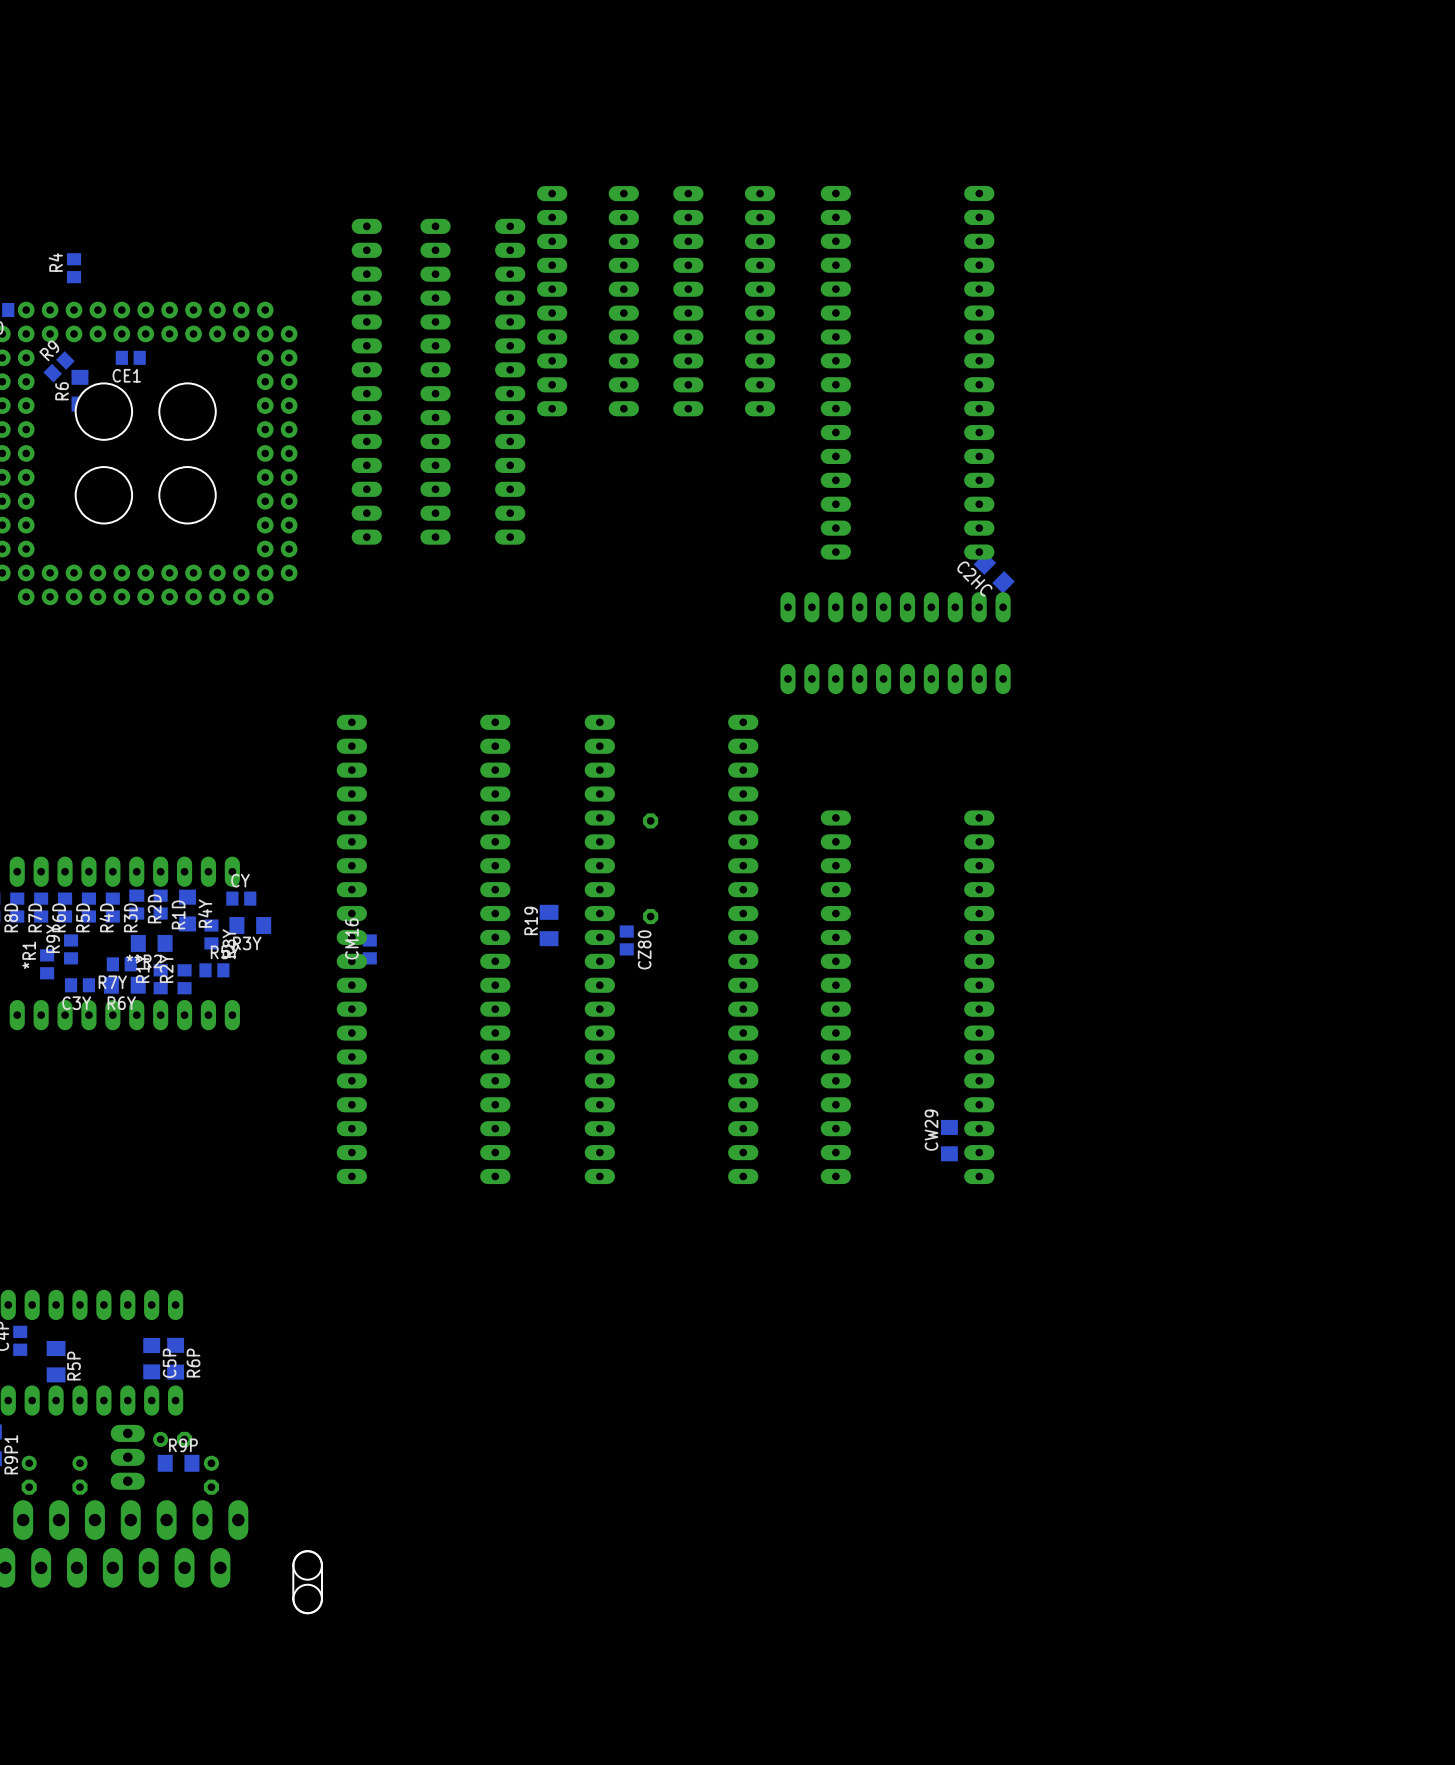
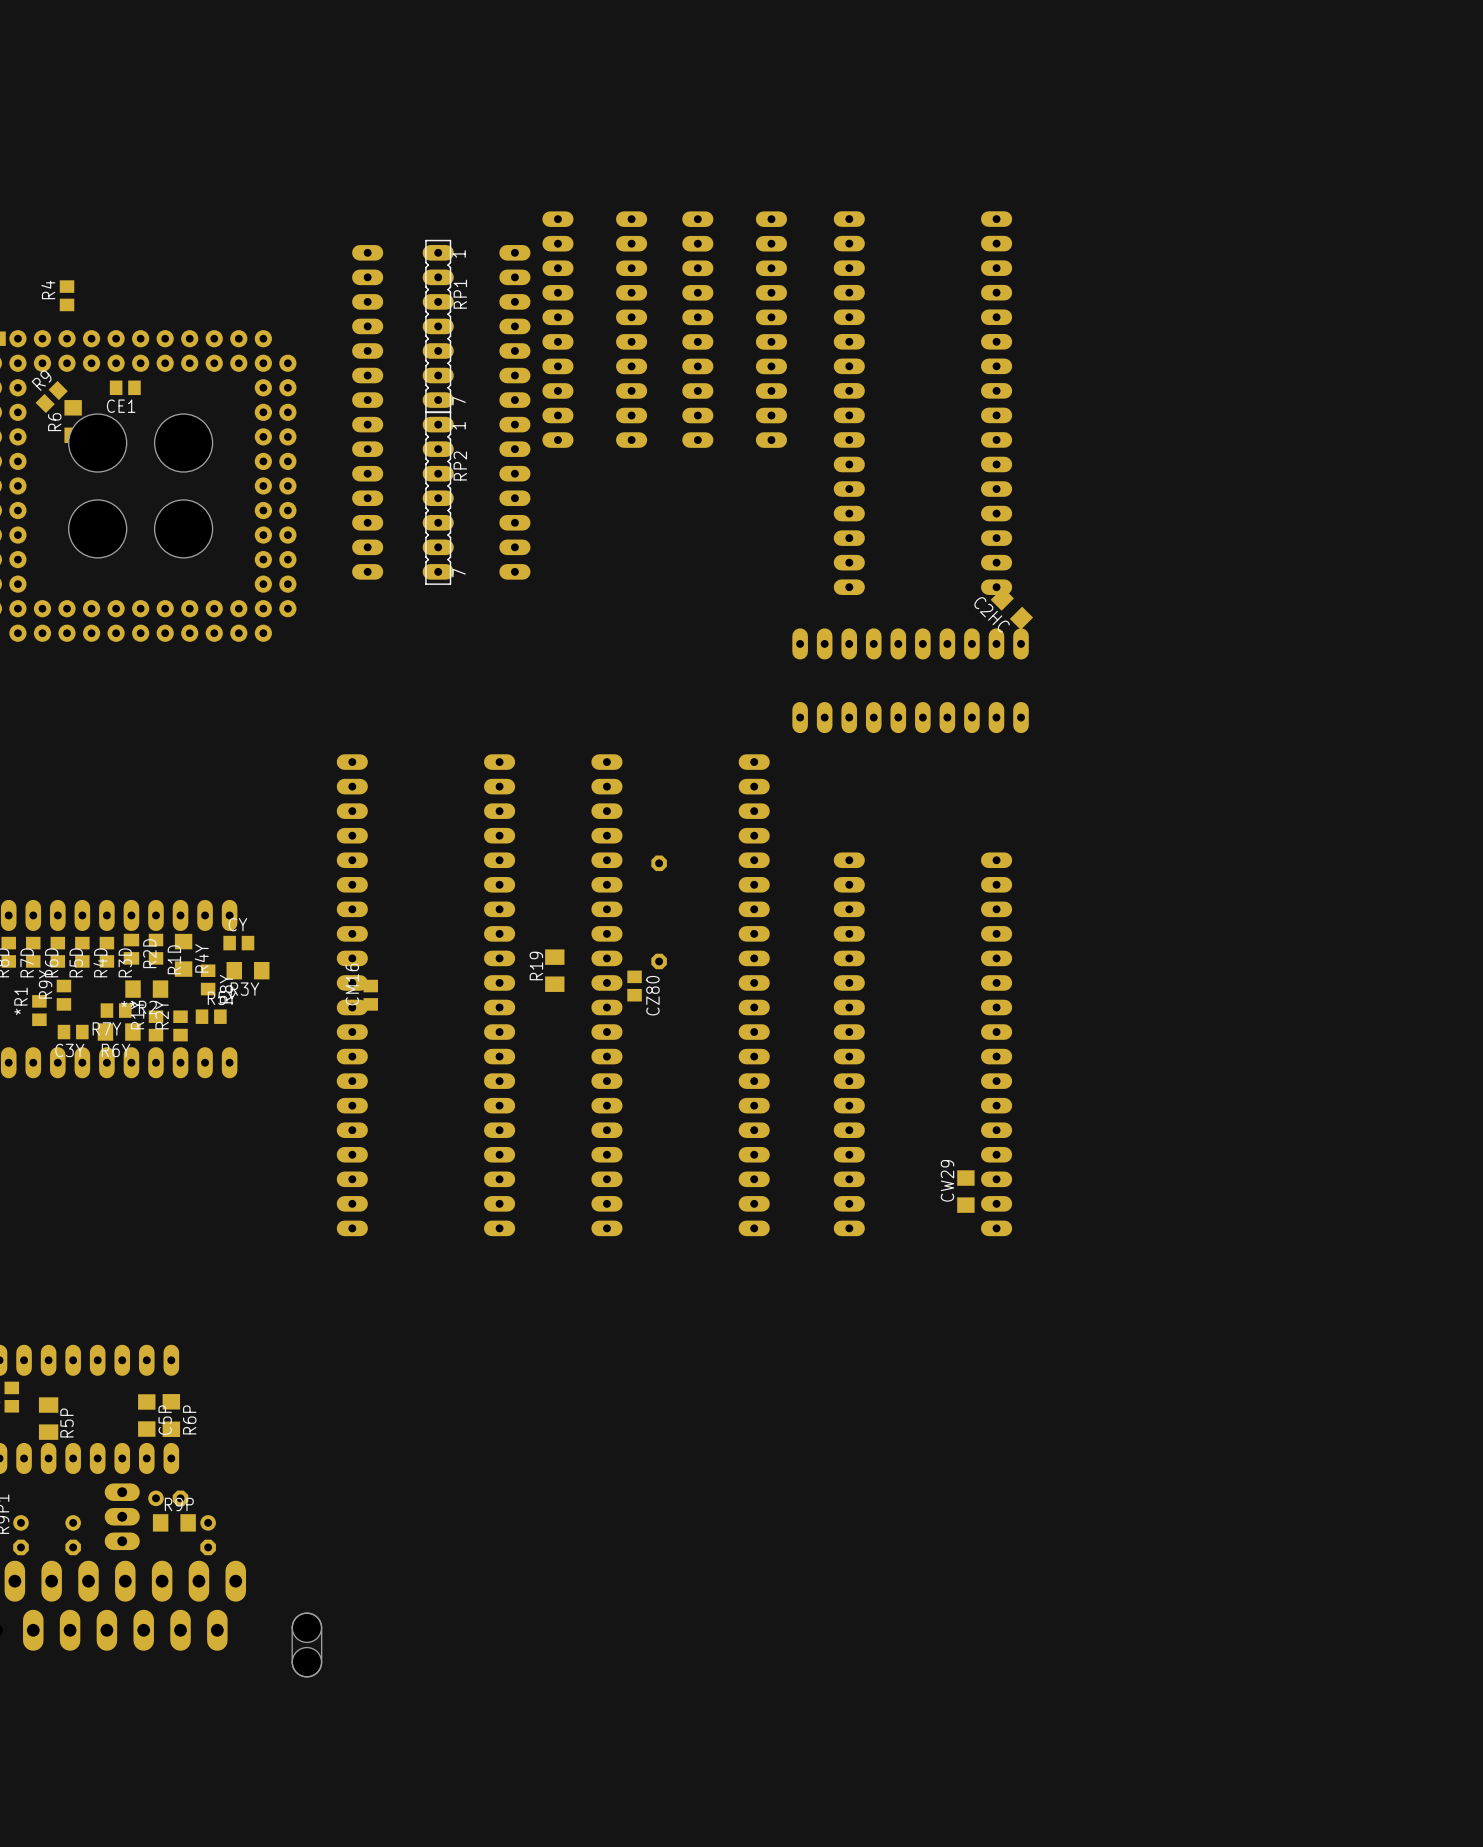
RP1 side: top (435, 298) -> bottom (438, 326)
RP2 side: top (435, 465) -> bottom (438, 498)

